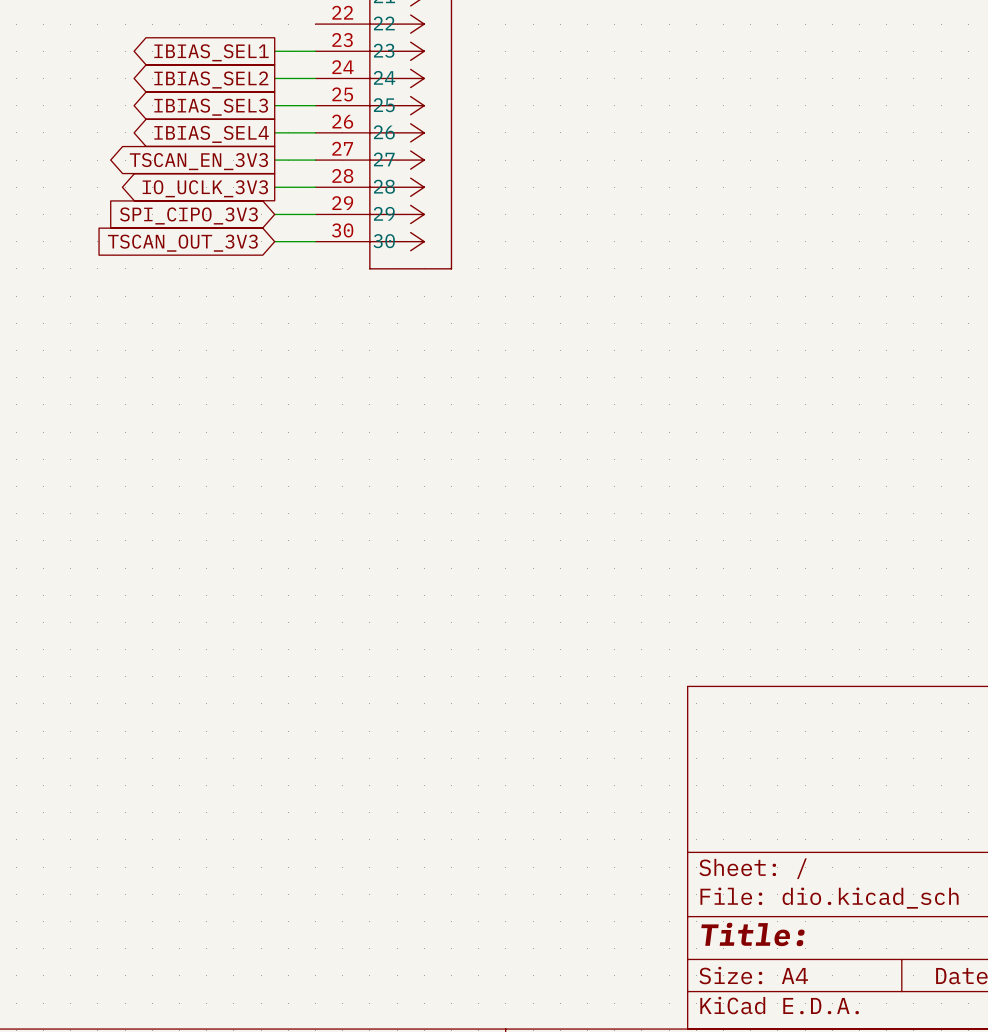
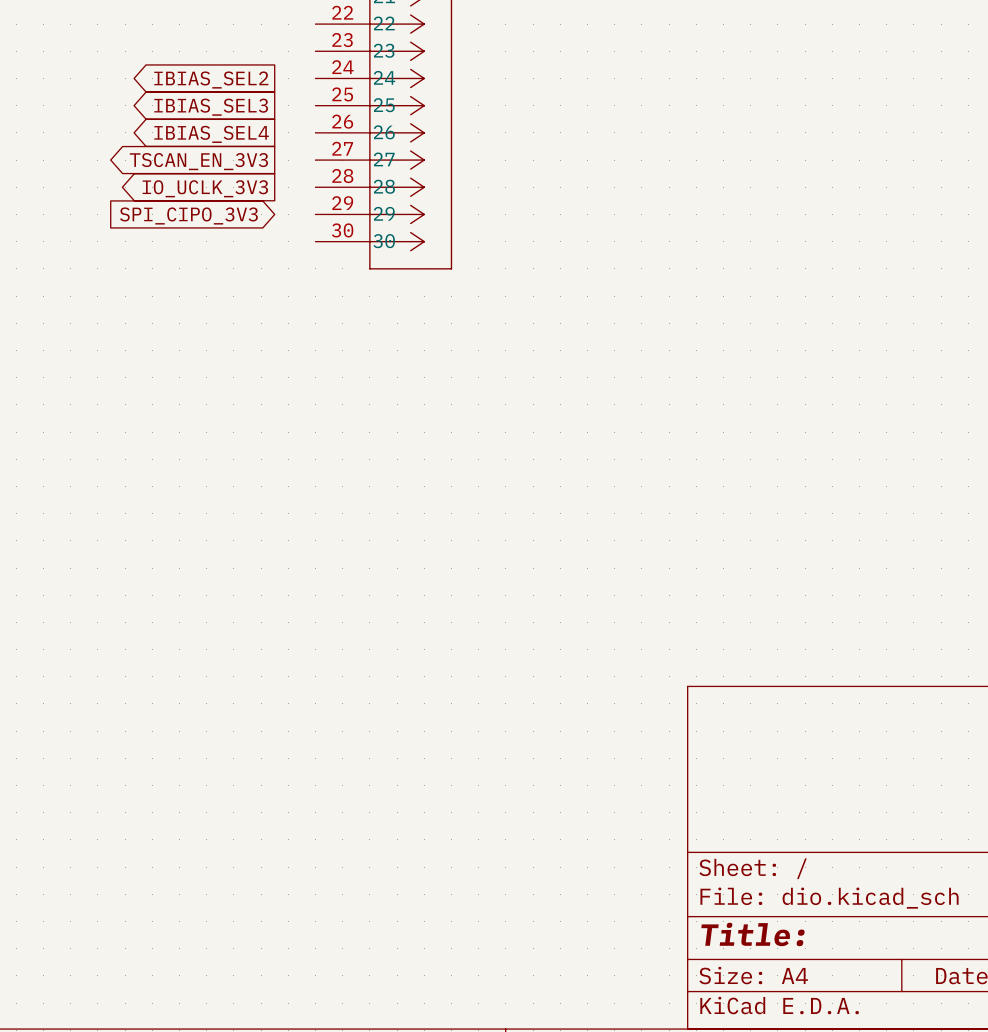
wire: (274, 51) (315, 51) -> none
global label: IBIAS_SEL1 (211, 52) -> none
wire: (274, 78) (315, 78) -> none
wire: (274, 105) (315, 105) -> none
wire: (274, 132) (315, 132) -> none
wire: (274, 160) (315, 160) -> none
wire: (274, 187) (315, 187) -> none
wire: (274, 214) (315, 214) -> none
wire: (274, 241) (315, 241) -> none
global label: TSCAN_OUT_3V3 (182, 243) -> none

